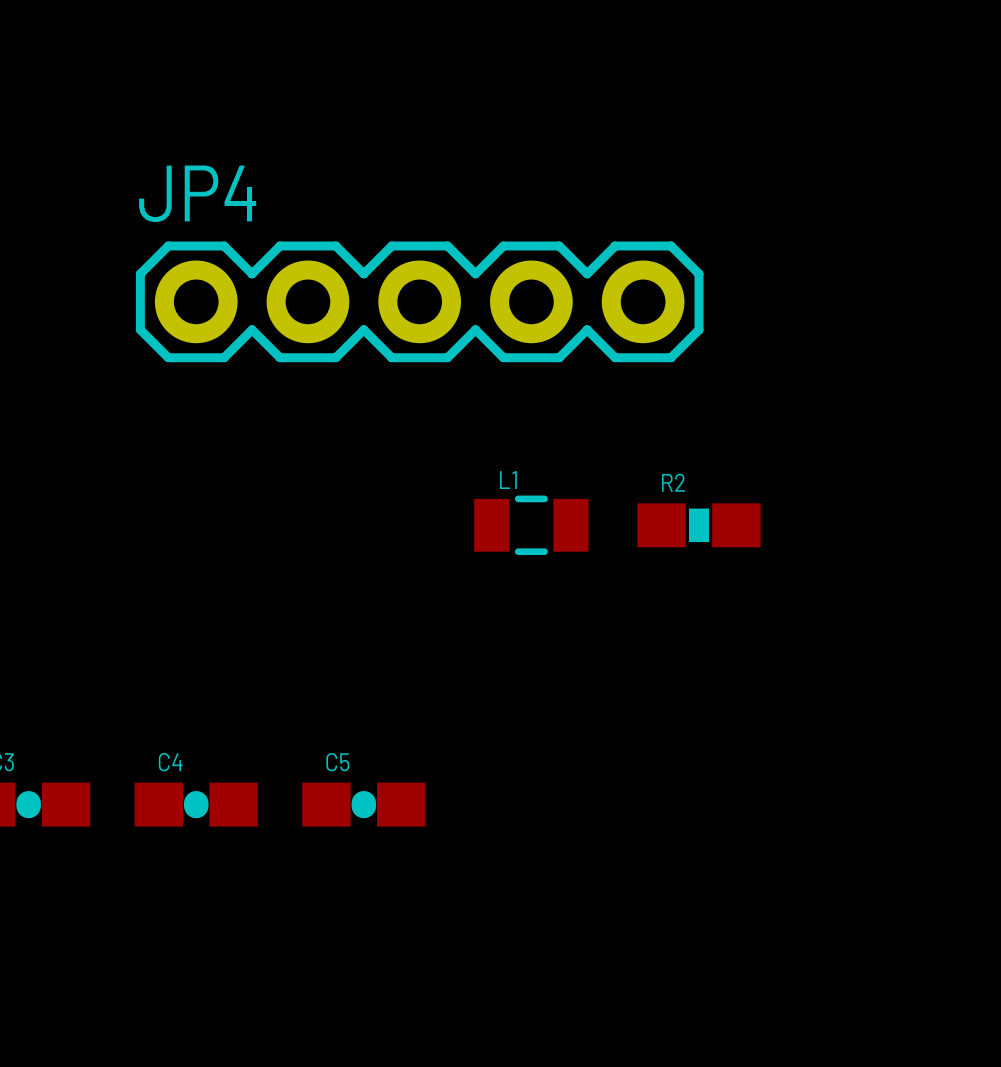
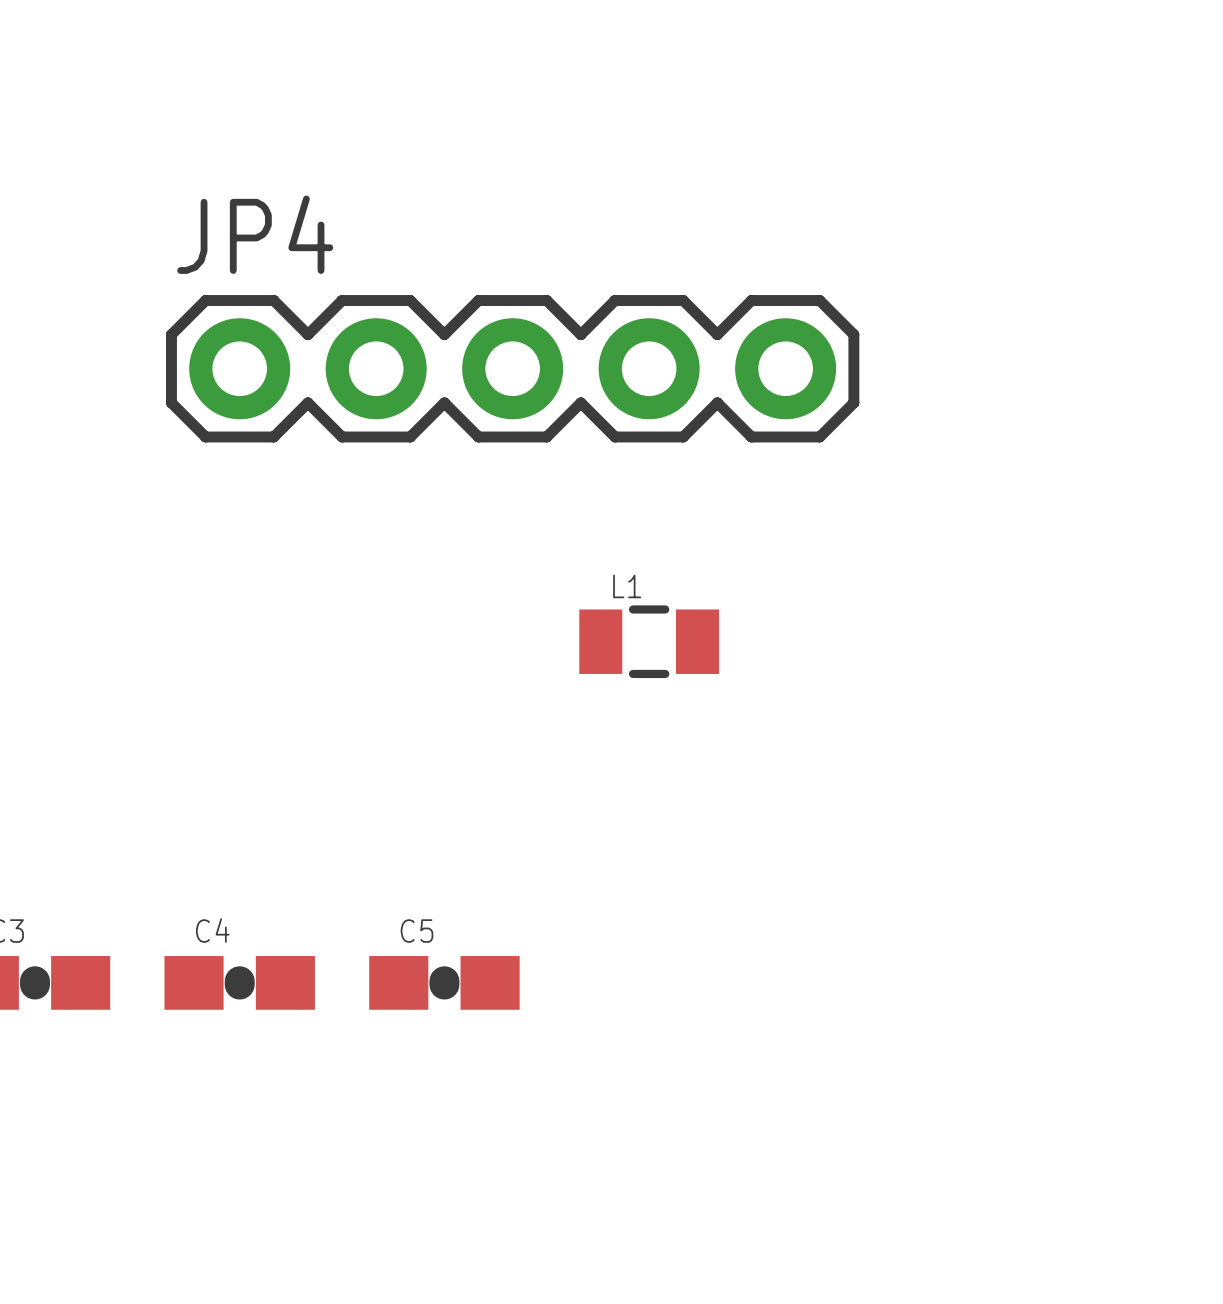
R2: (698, 525) -> none

